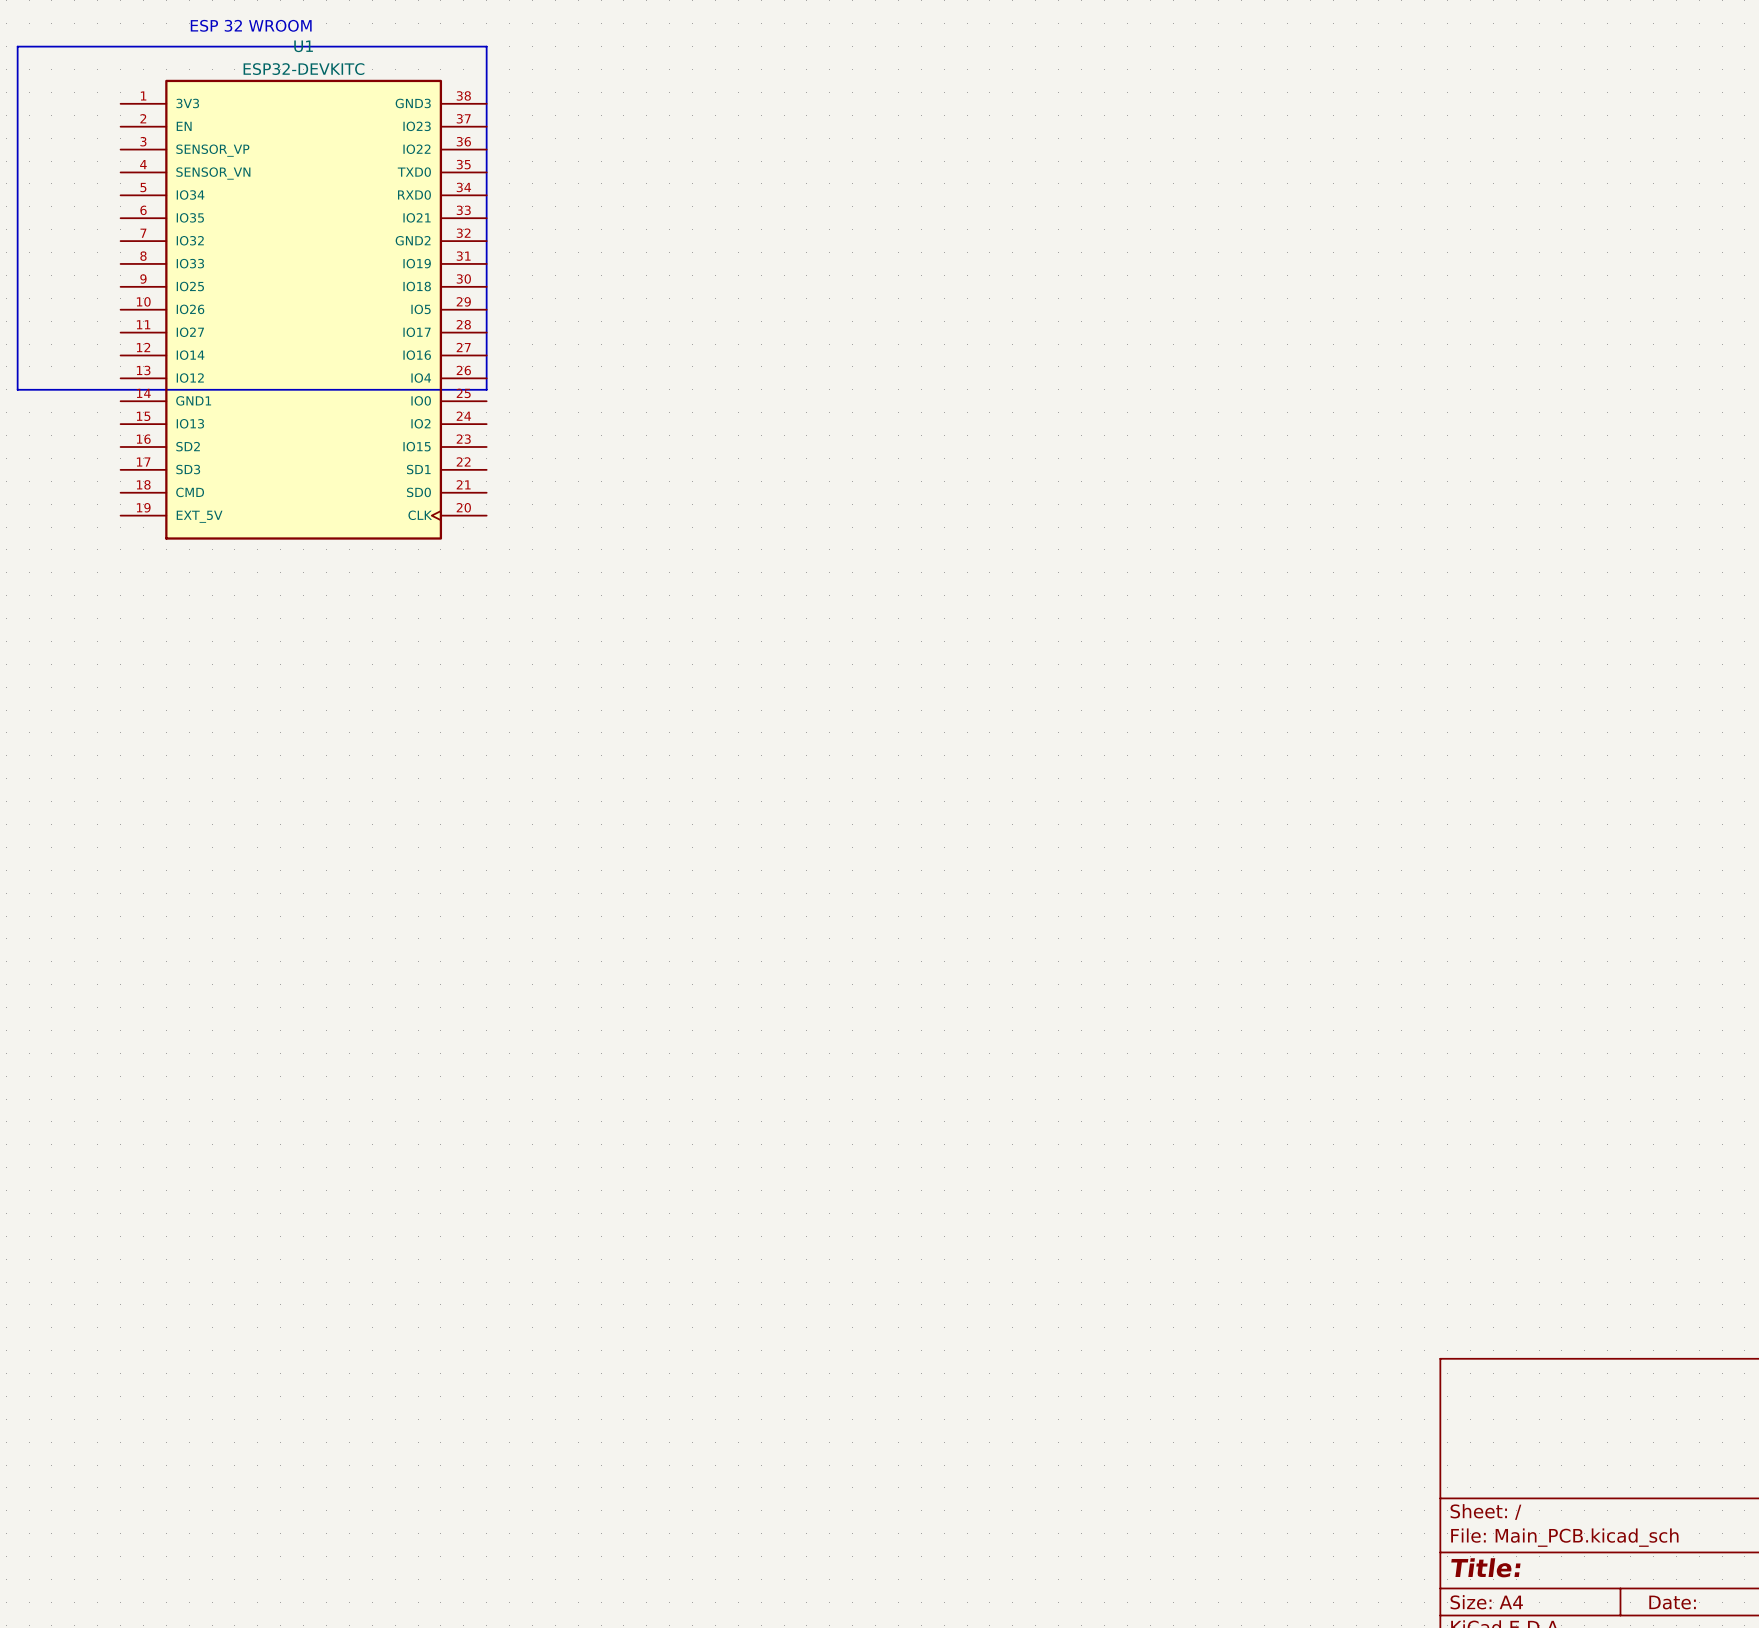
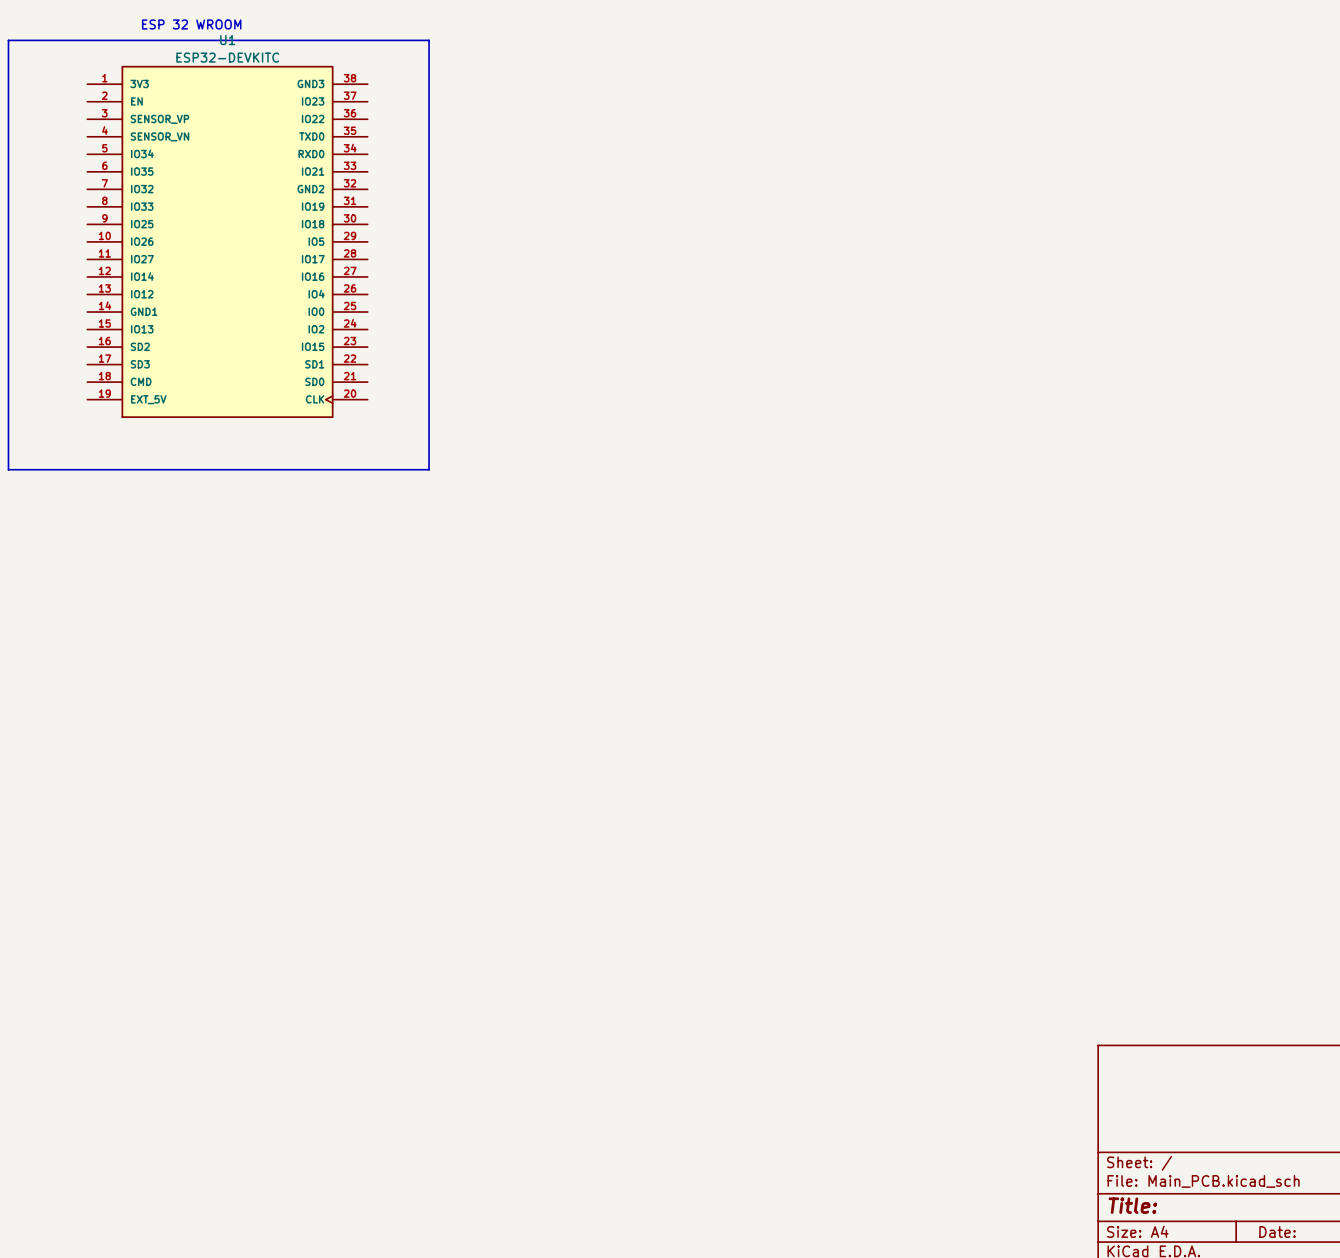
line: (486, 46) (486, 389) (17, 389) -> (367, 40) (429, 40) (429, 469) (8, 469) (8, 303)

